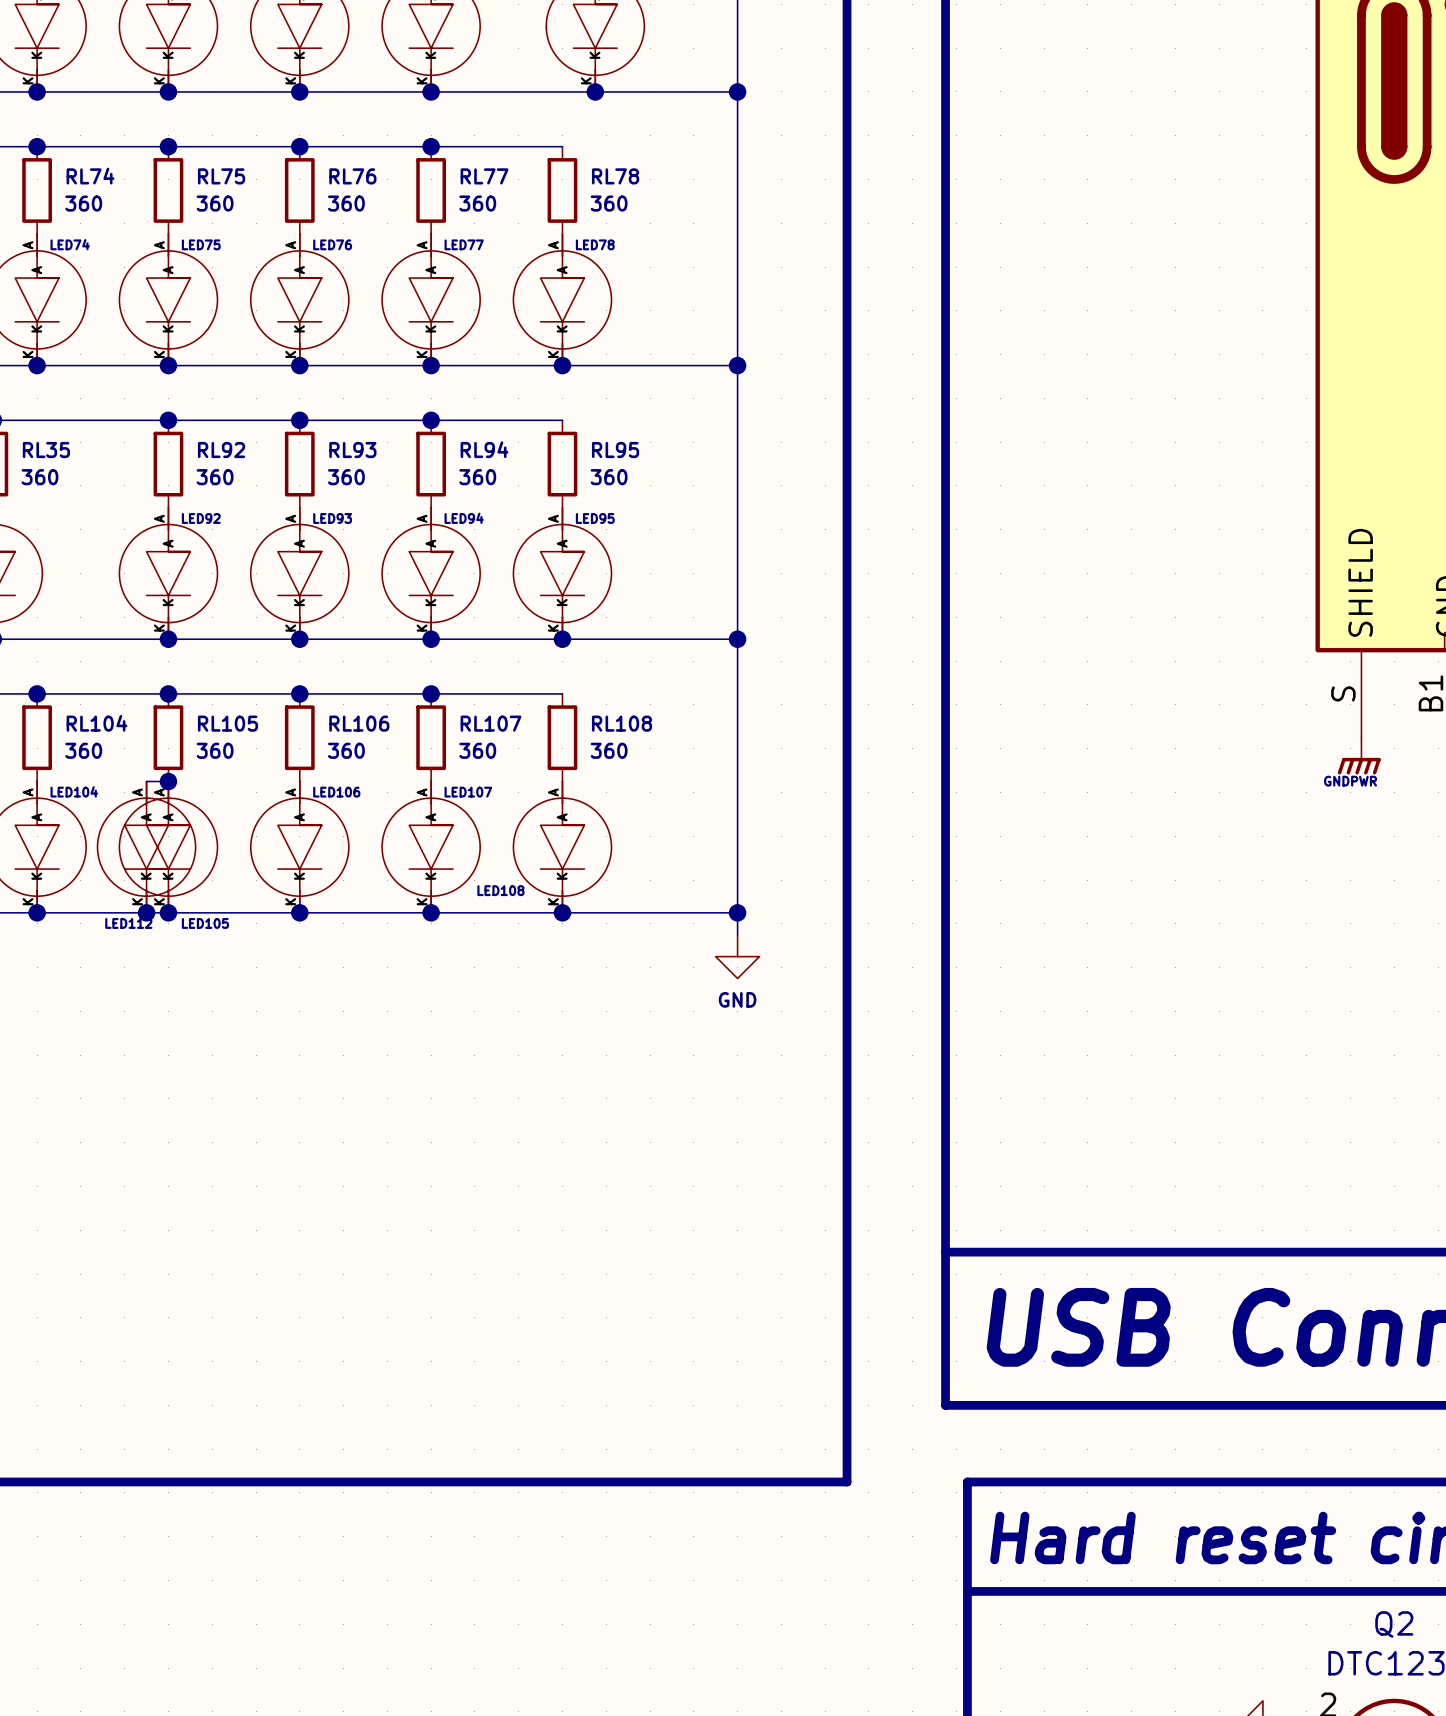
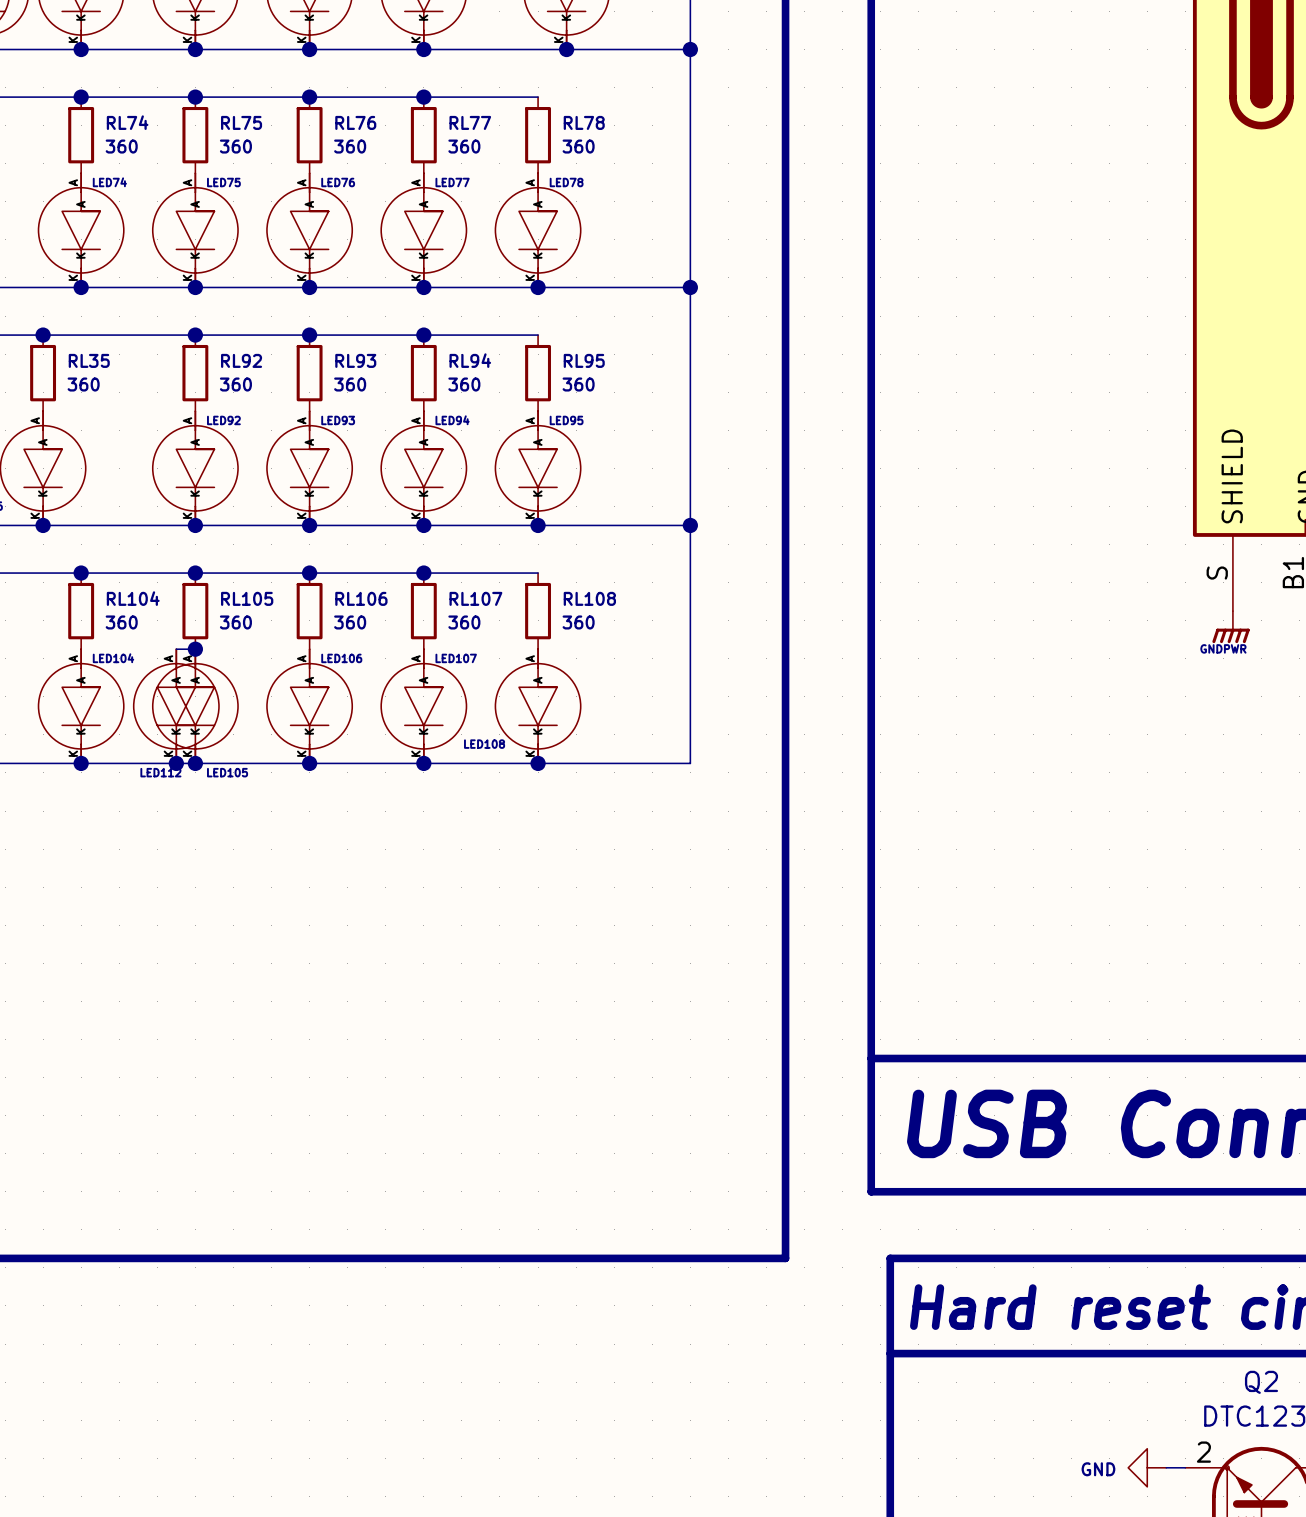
wire: (737, 912) (737, 934) -> none
junction: (737, 912) -> none
power symbol: GND (737, 956) -> none

